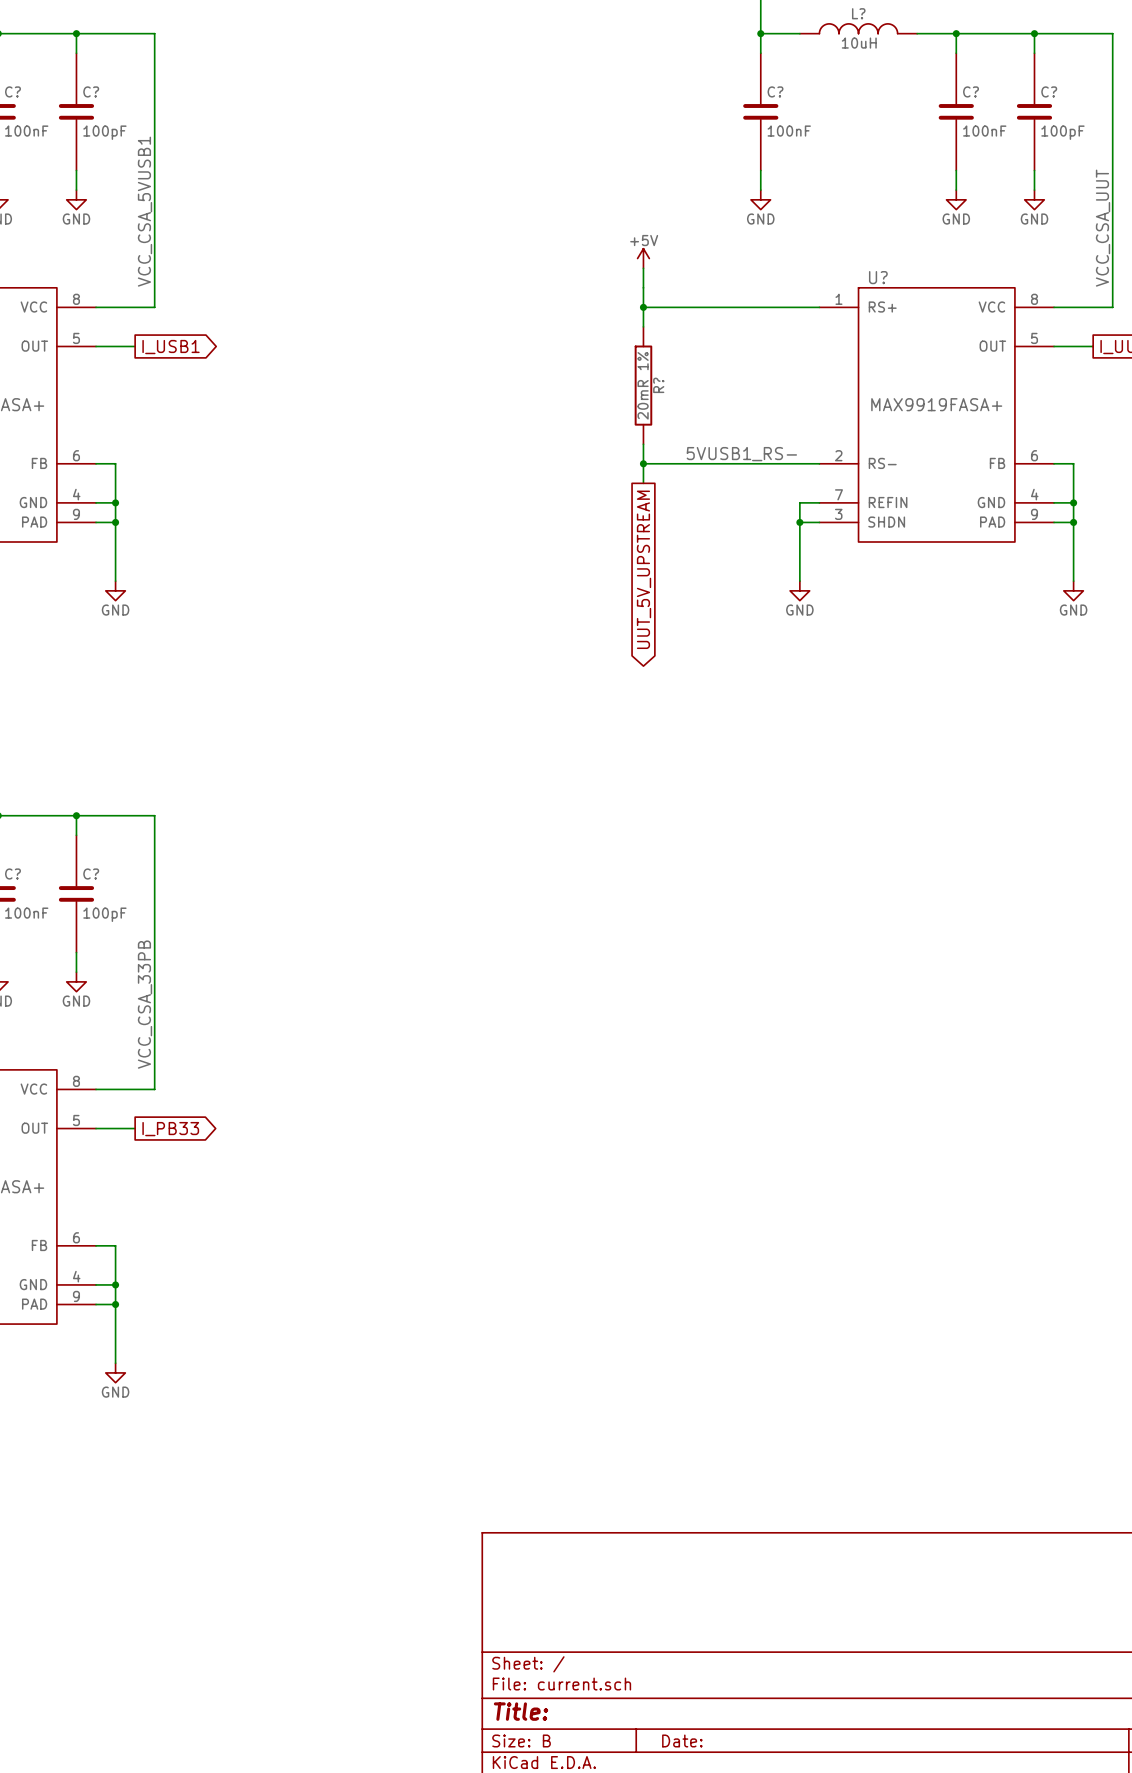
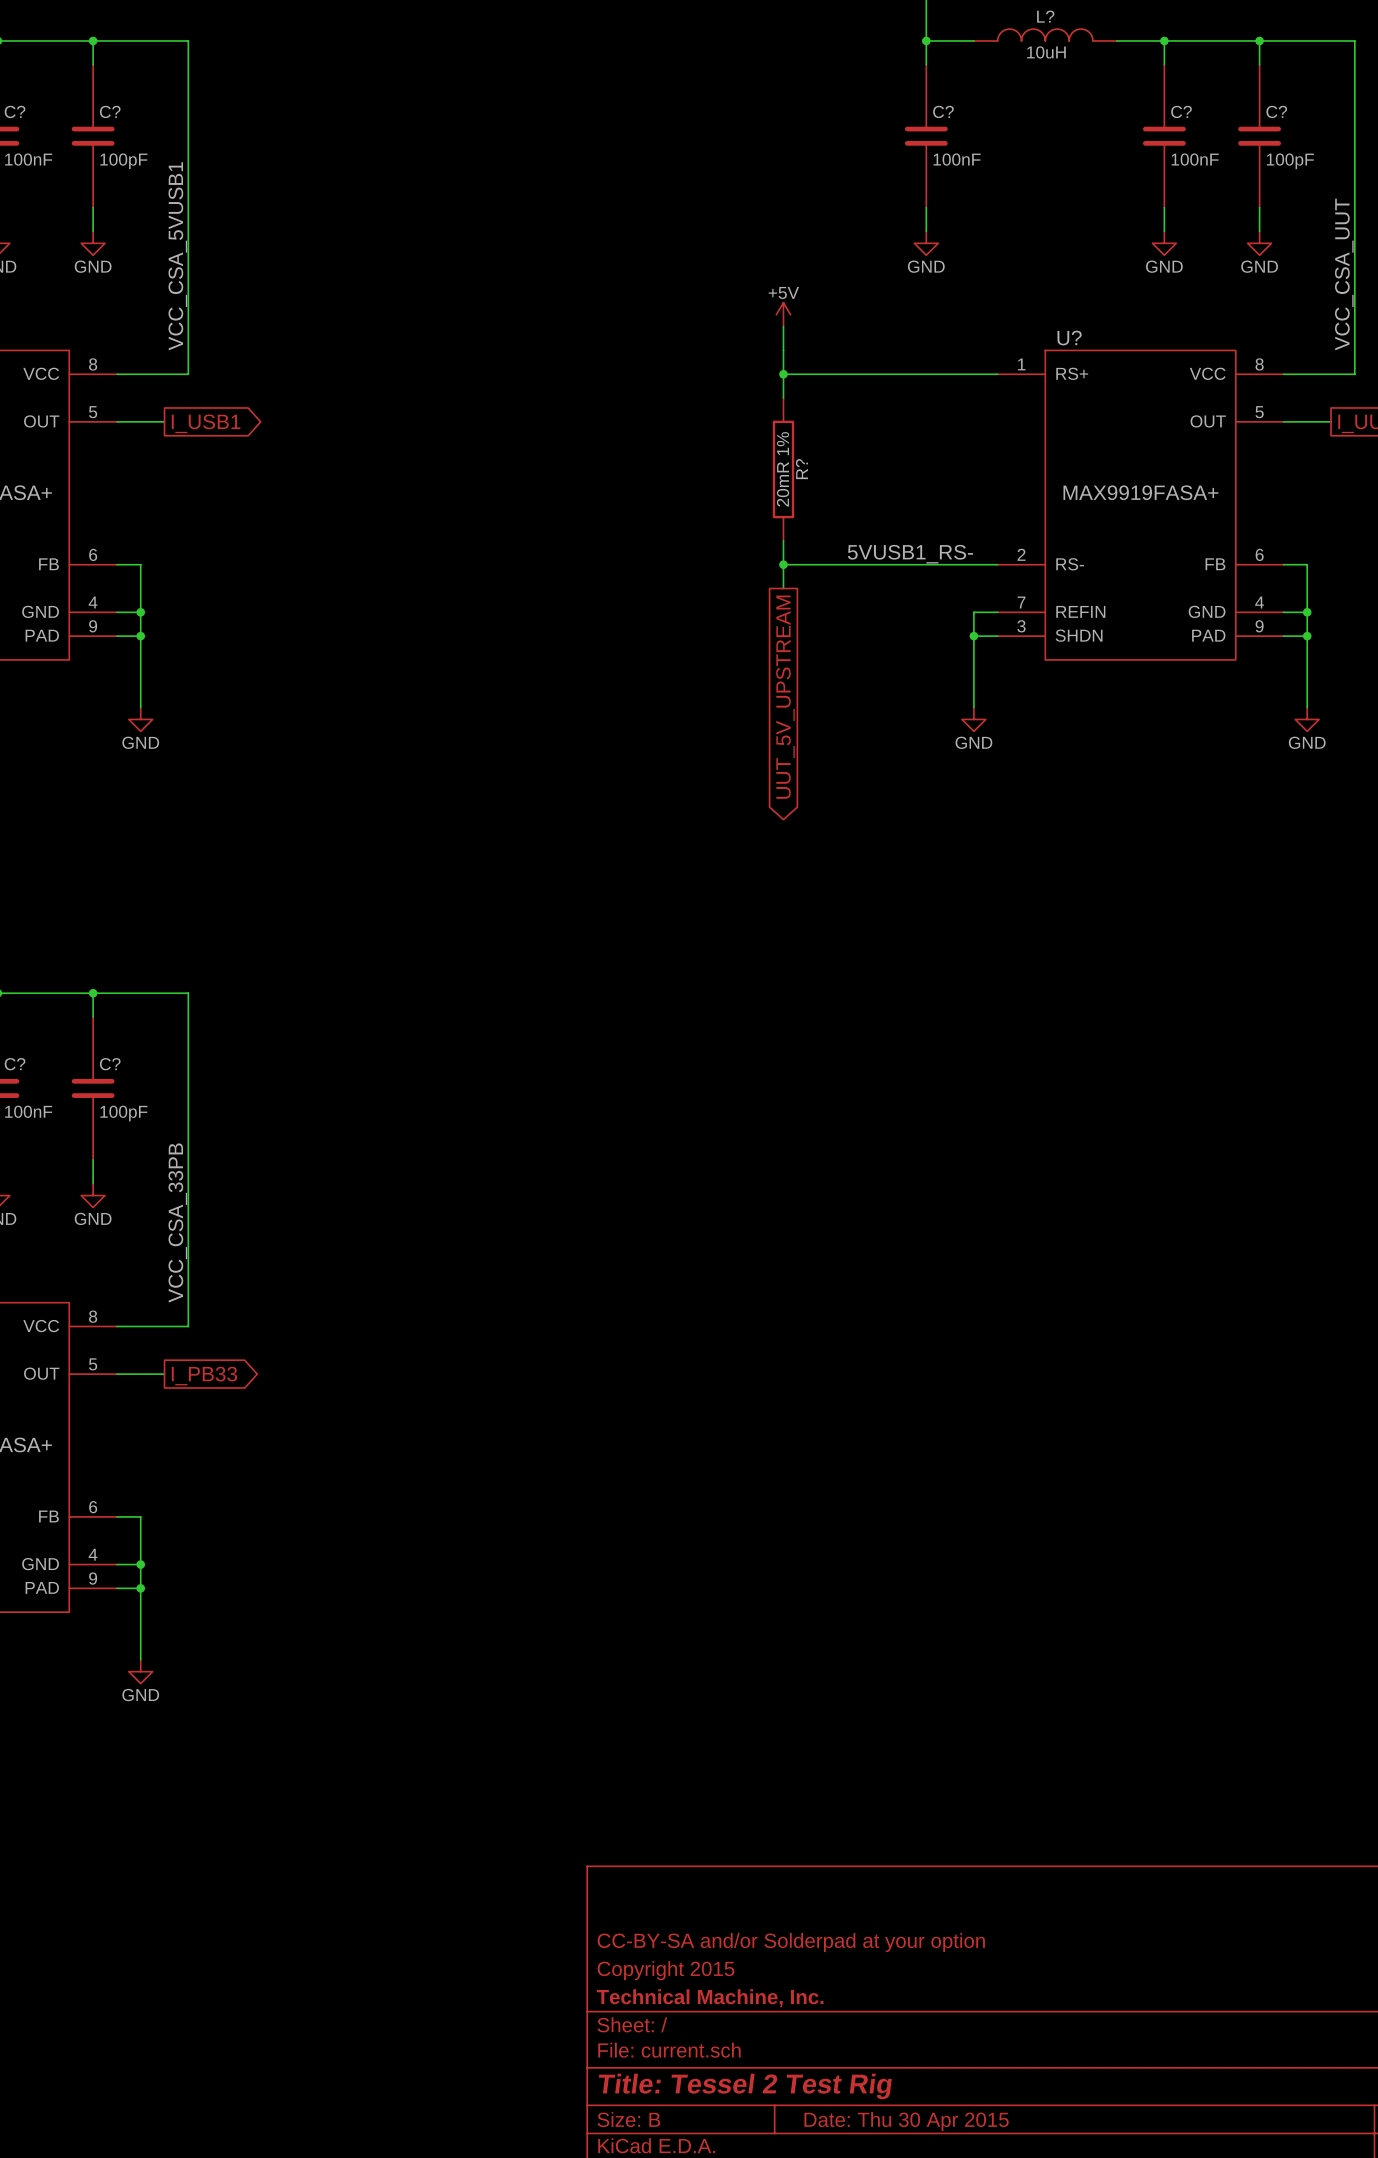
title block: none -> CC-BY-SA and/or Solderpad at your option (791, 1942)
title block: none -> Copyright 2015 (665, 1970)
title block: none -> Technical Machine, Inc. (710, 1998)
title block: Title: (521, 1711) -> Title: Tessel 2 Test Rig (745, 2086)
title block: Date: (682, 1740) -> Date: Thu 30 Apr 2015 (906, 2121)

